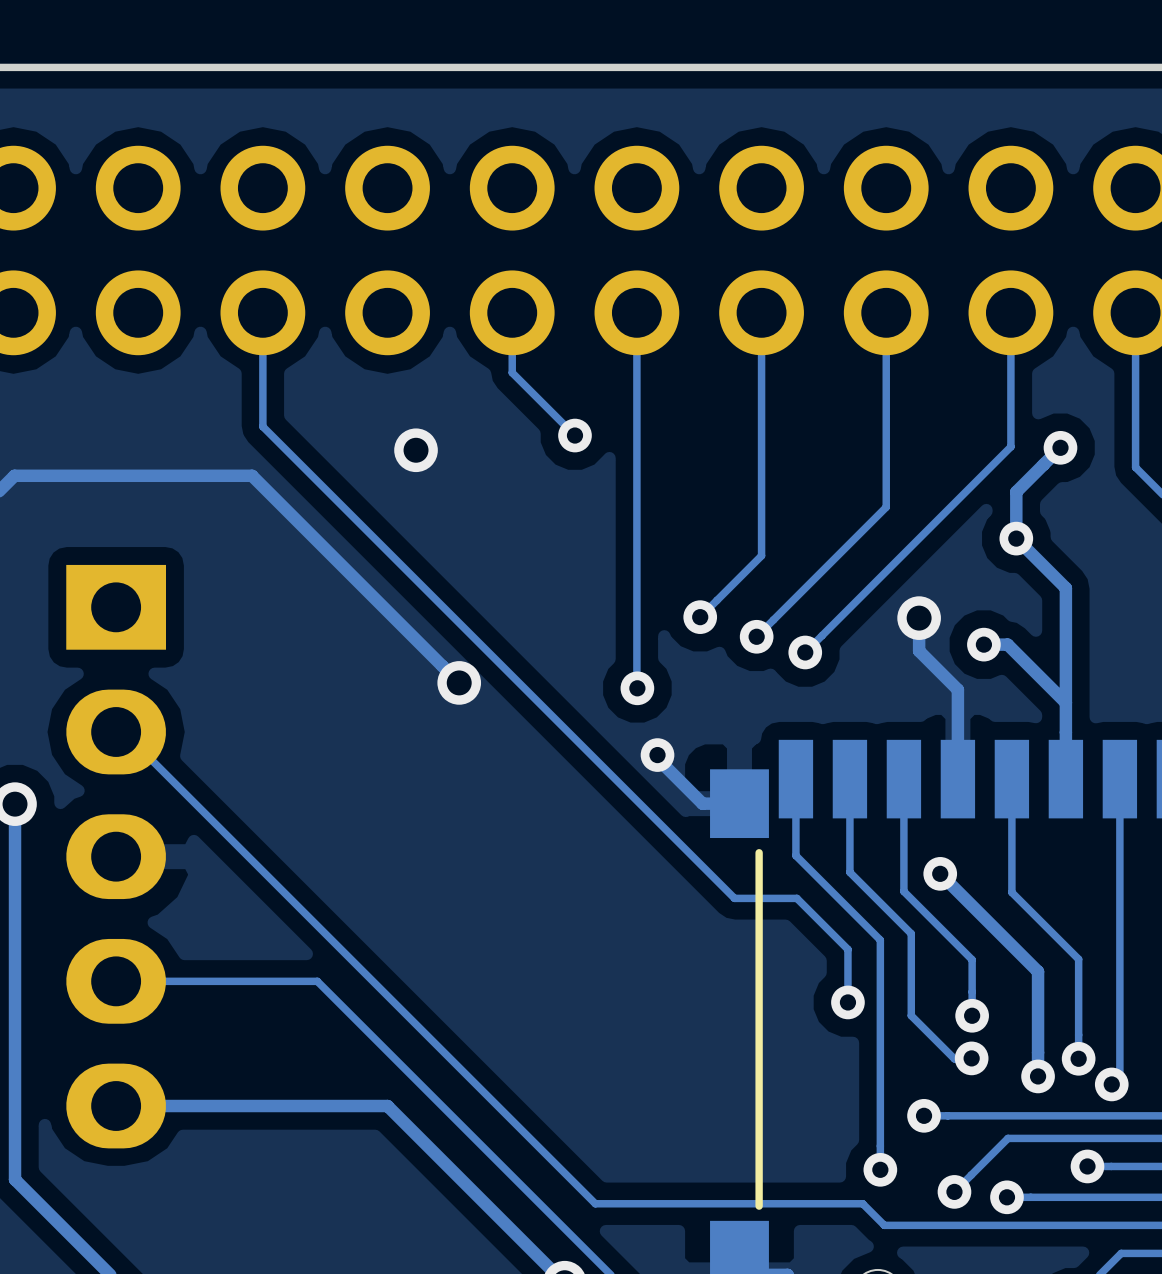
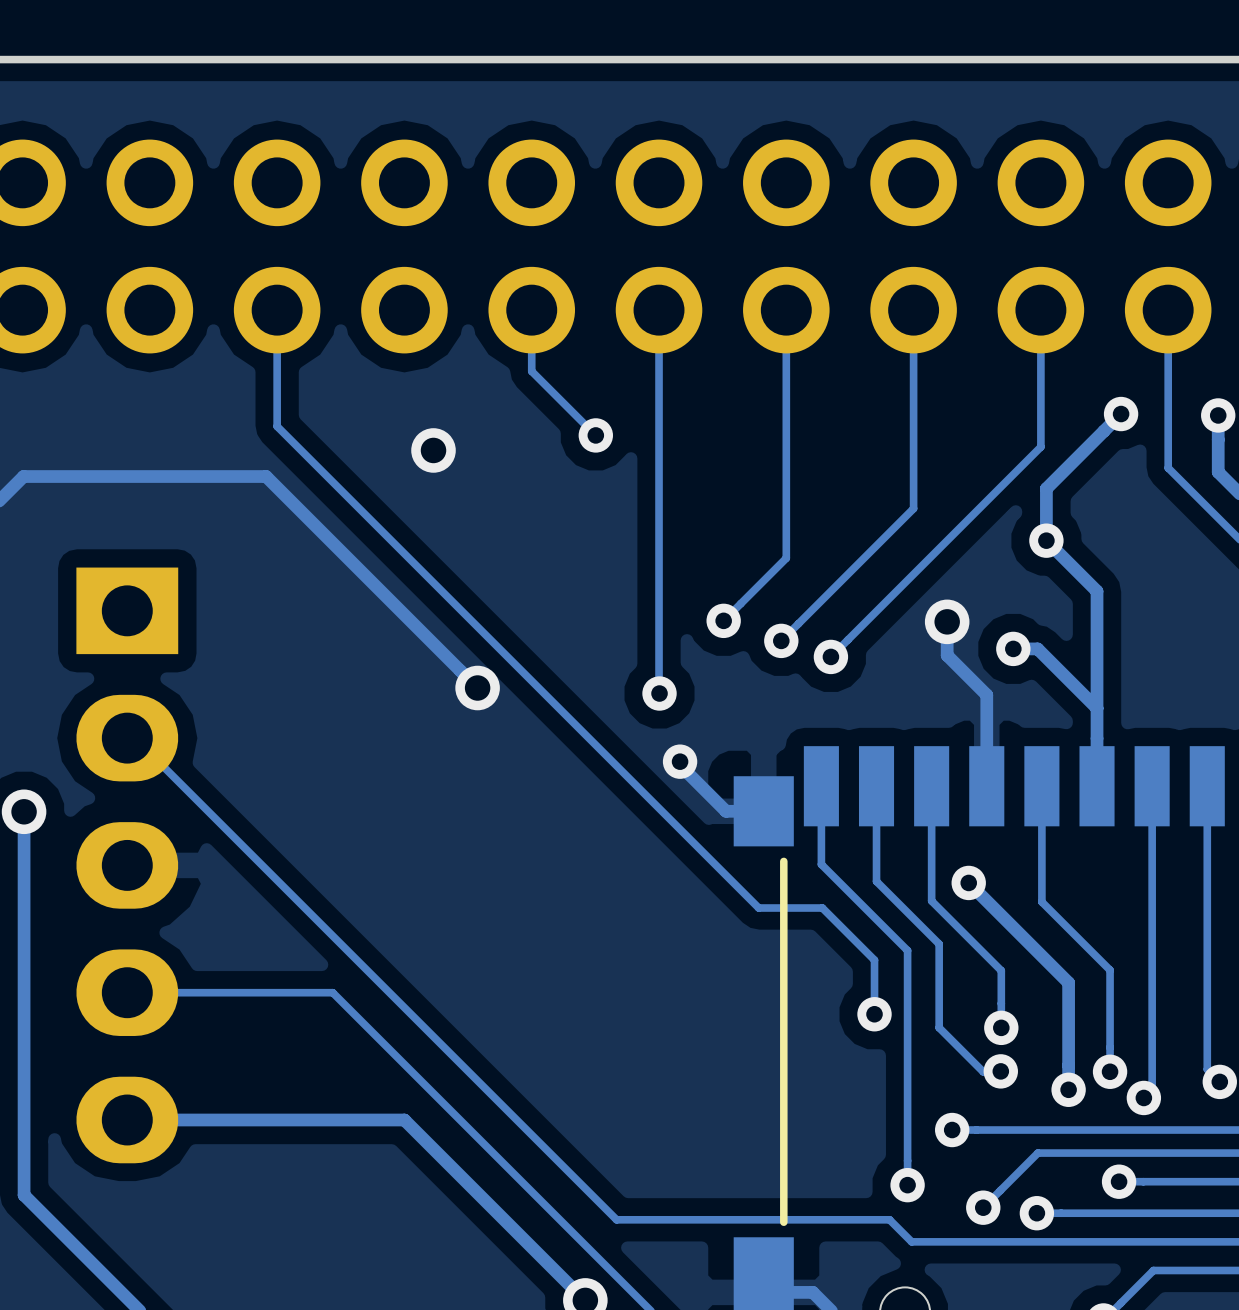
track: (1060, 447) (1016, 491) -> (1121, 414) (1046, 488) (1046, 493)
via position: (1060, 447) -> (1121, 414)

